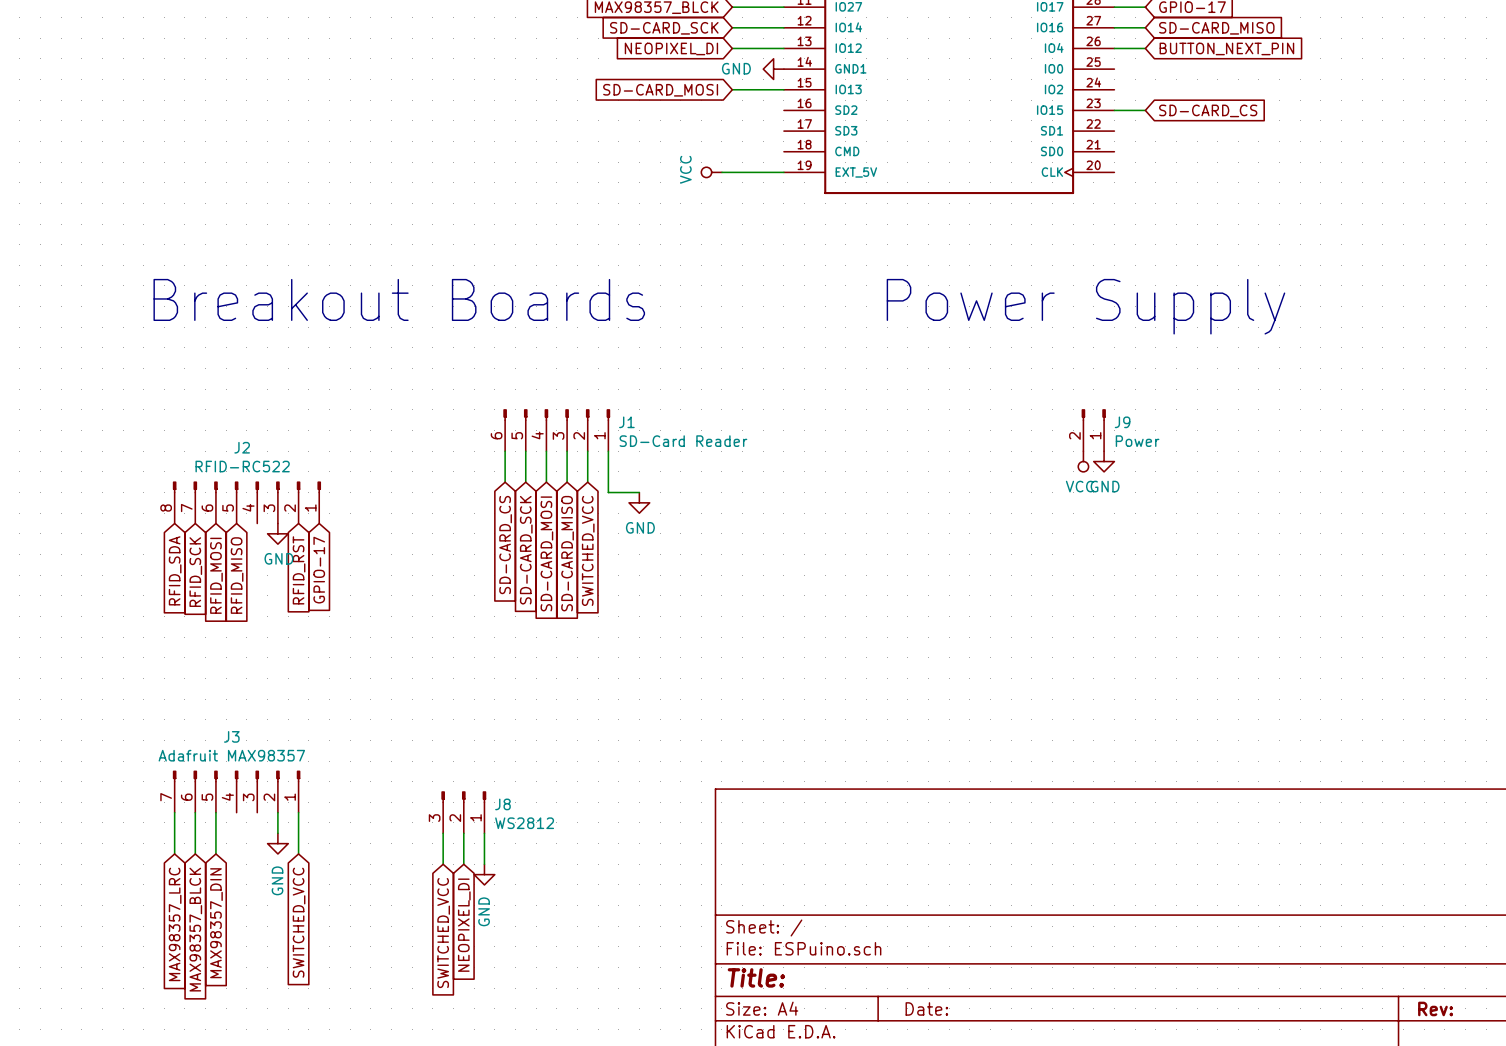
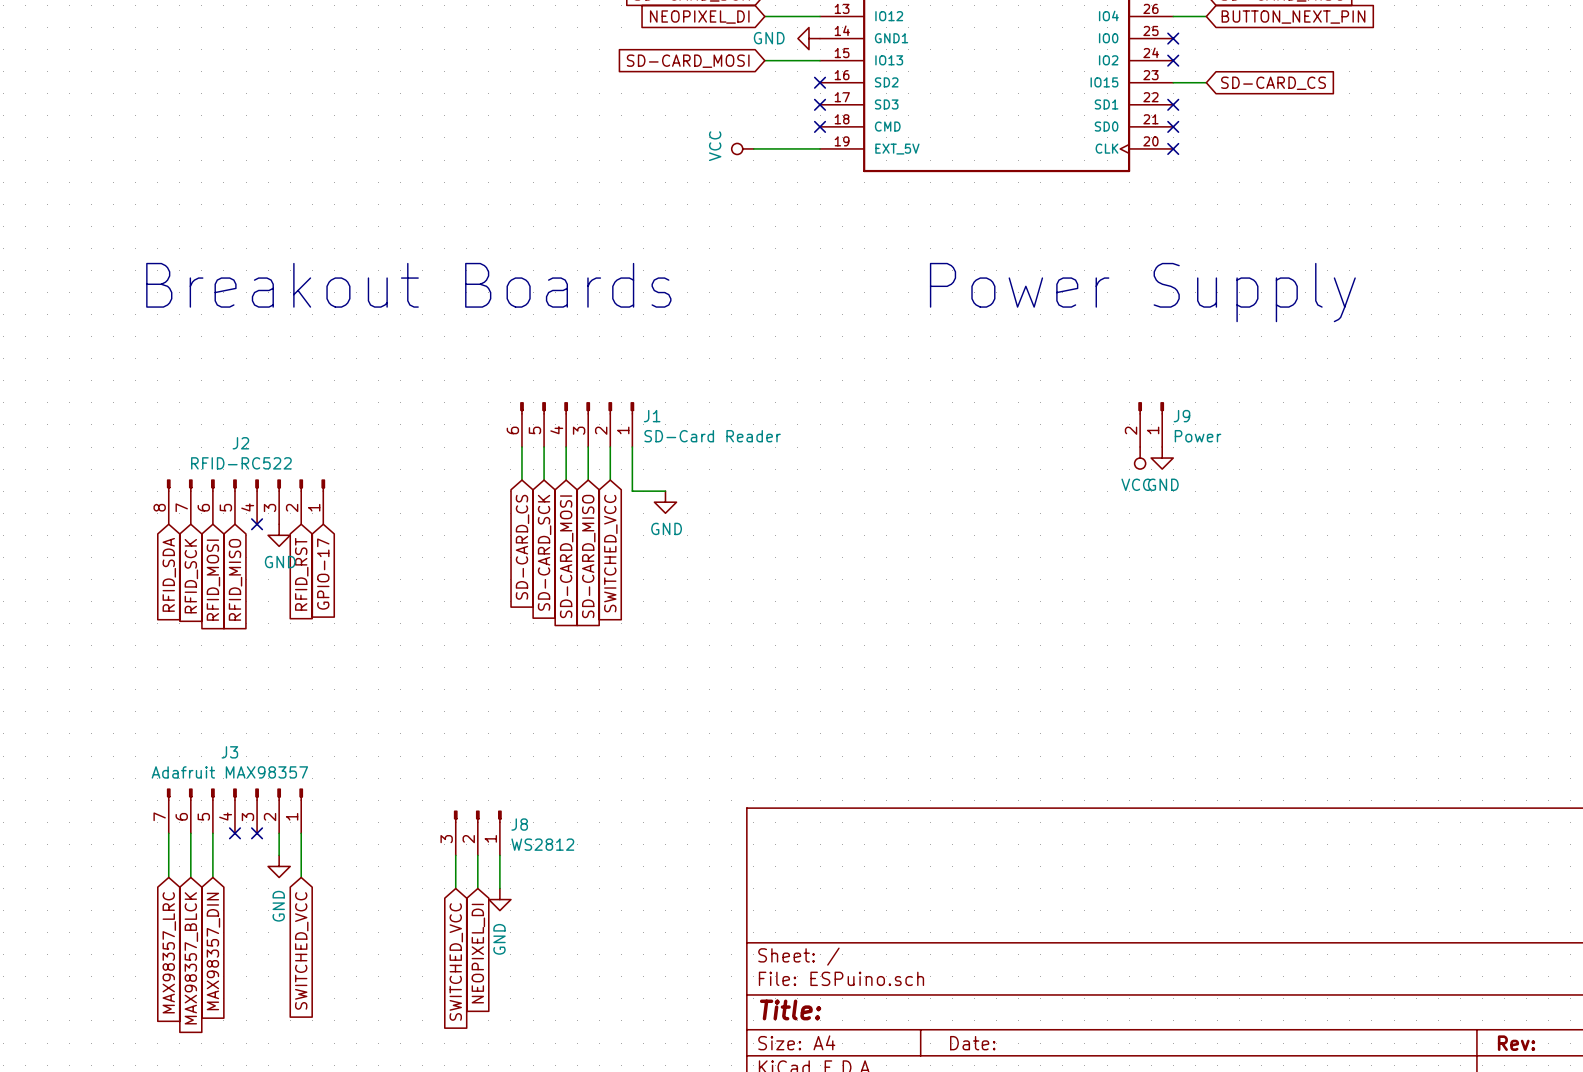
no-connect mark: none -> (1173, 38)
no-connect mark: none -> (1173, 60)
no-connect mark: none -> (820, 82)
no-connect mark: none -> (820, 104)
no-connect mark: none -> (1173, 104)
no-connect mark: none -> (820, 126)
no-connect mark: none -> (1173, 126)
no-connect mark: none -> (1173, 148)
no-connect mark: none -> (257, 524)
no-connect mark: none -> (234, 833)
no-connect mark: none -> (257, 833)

